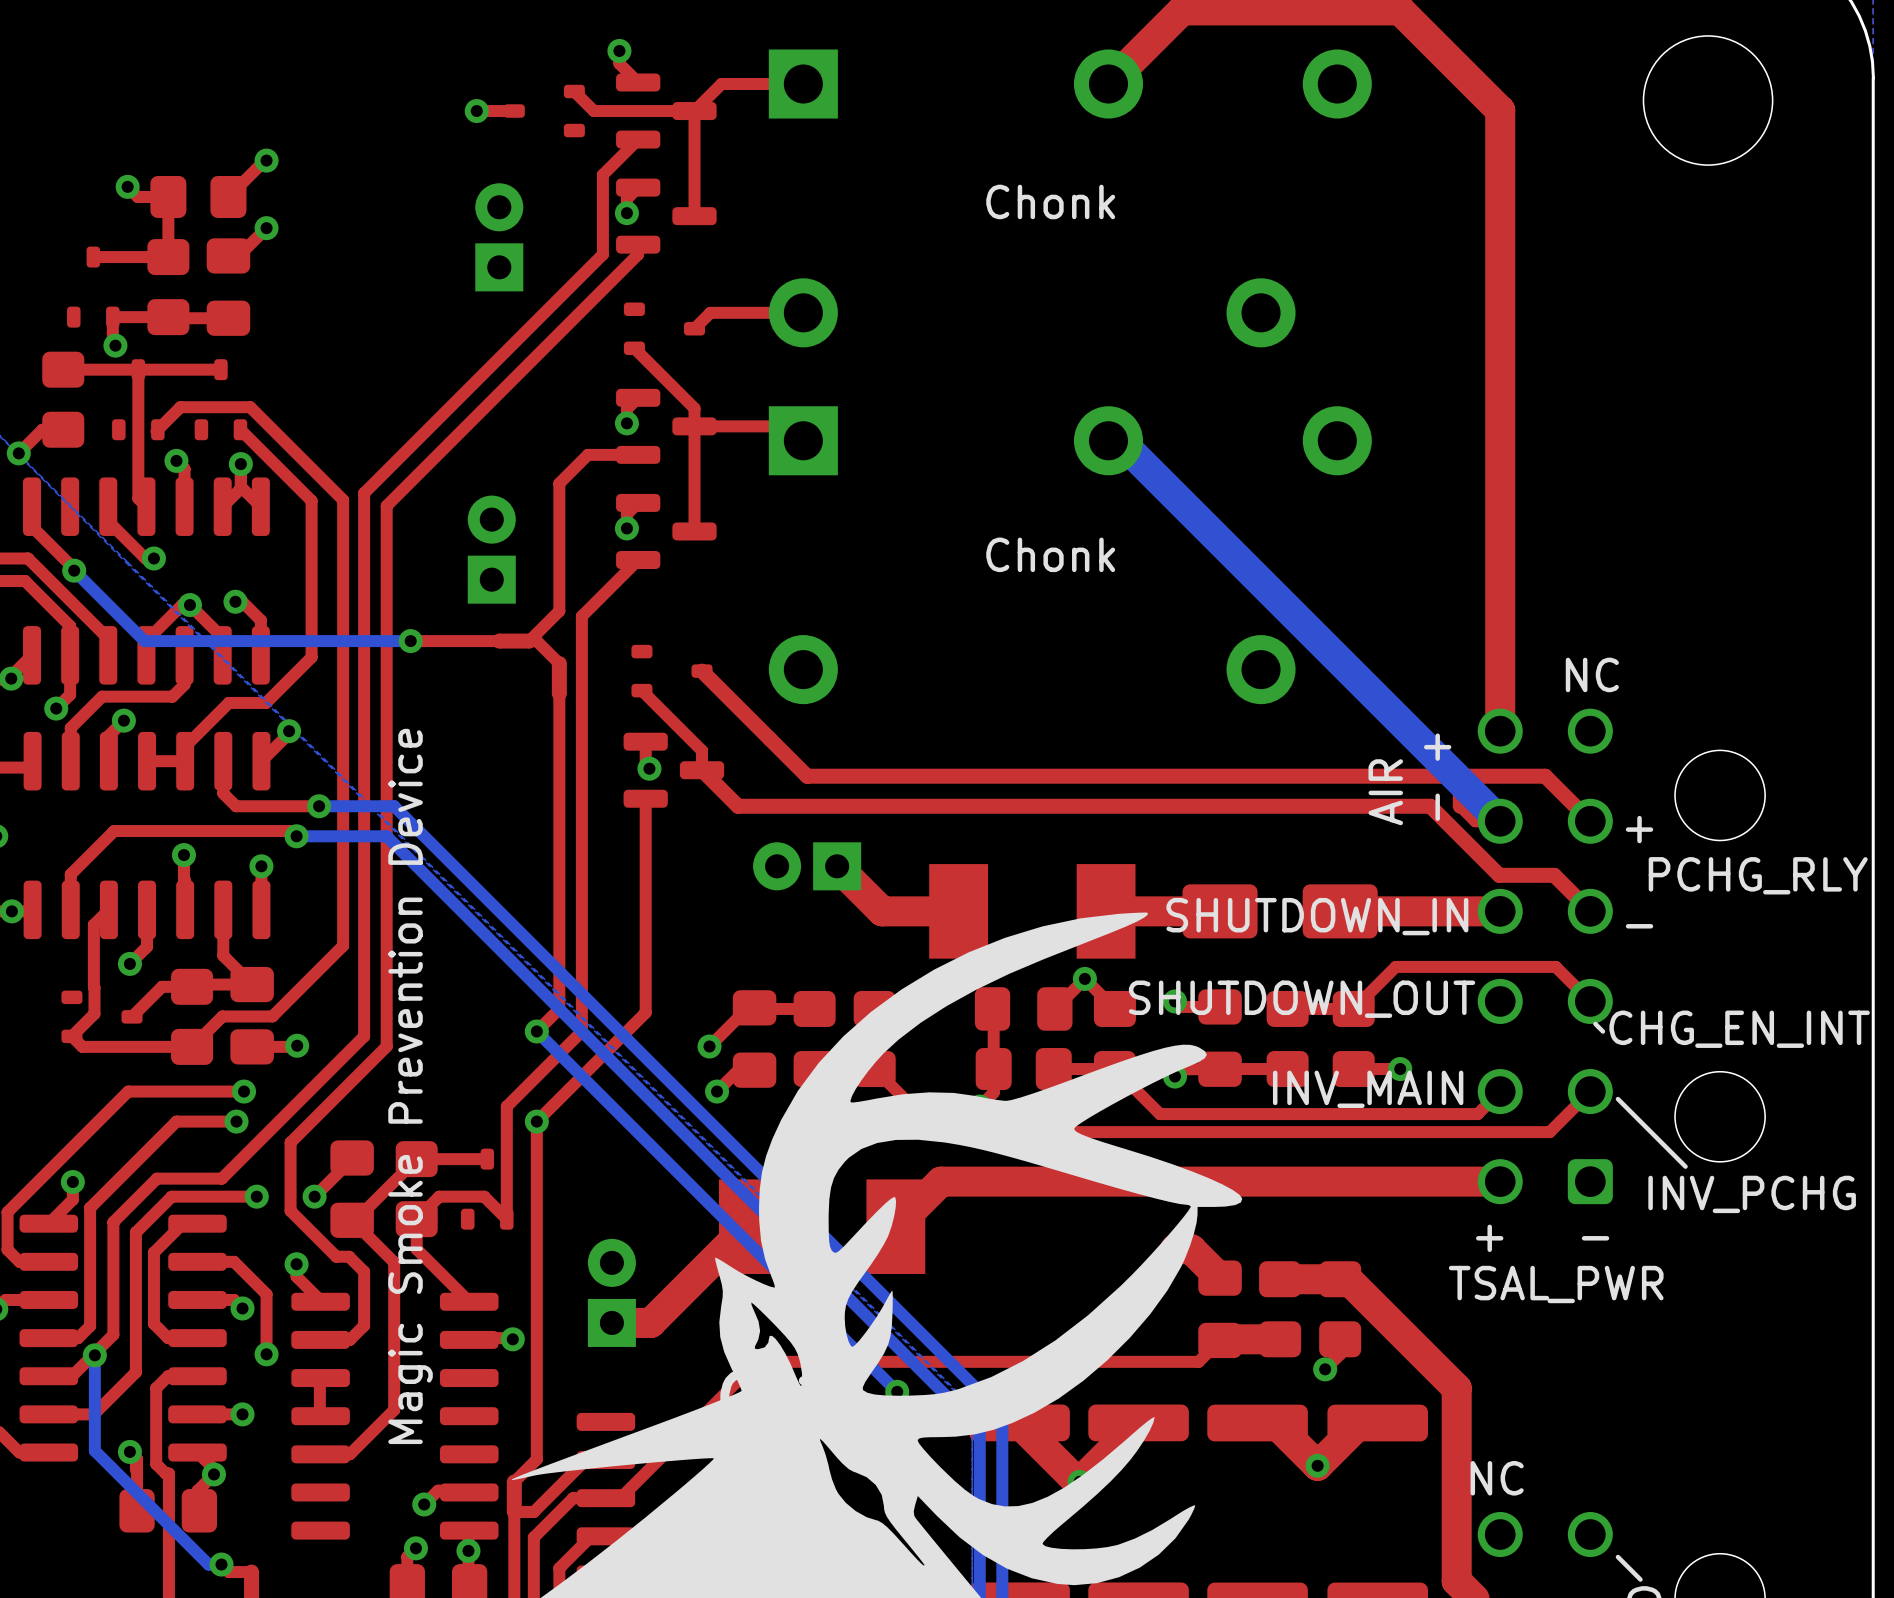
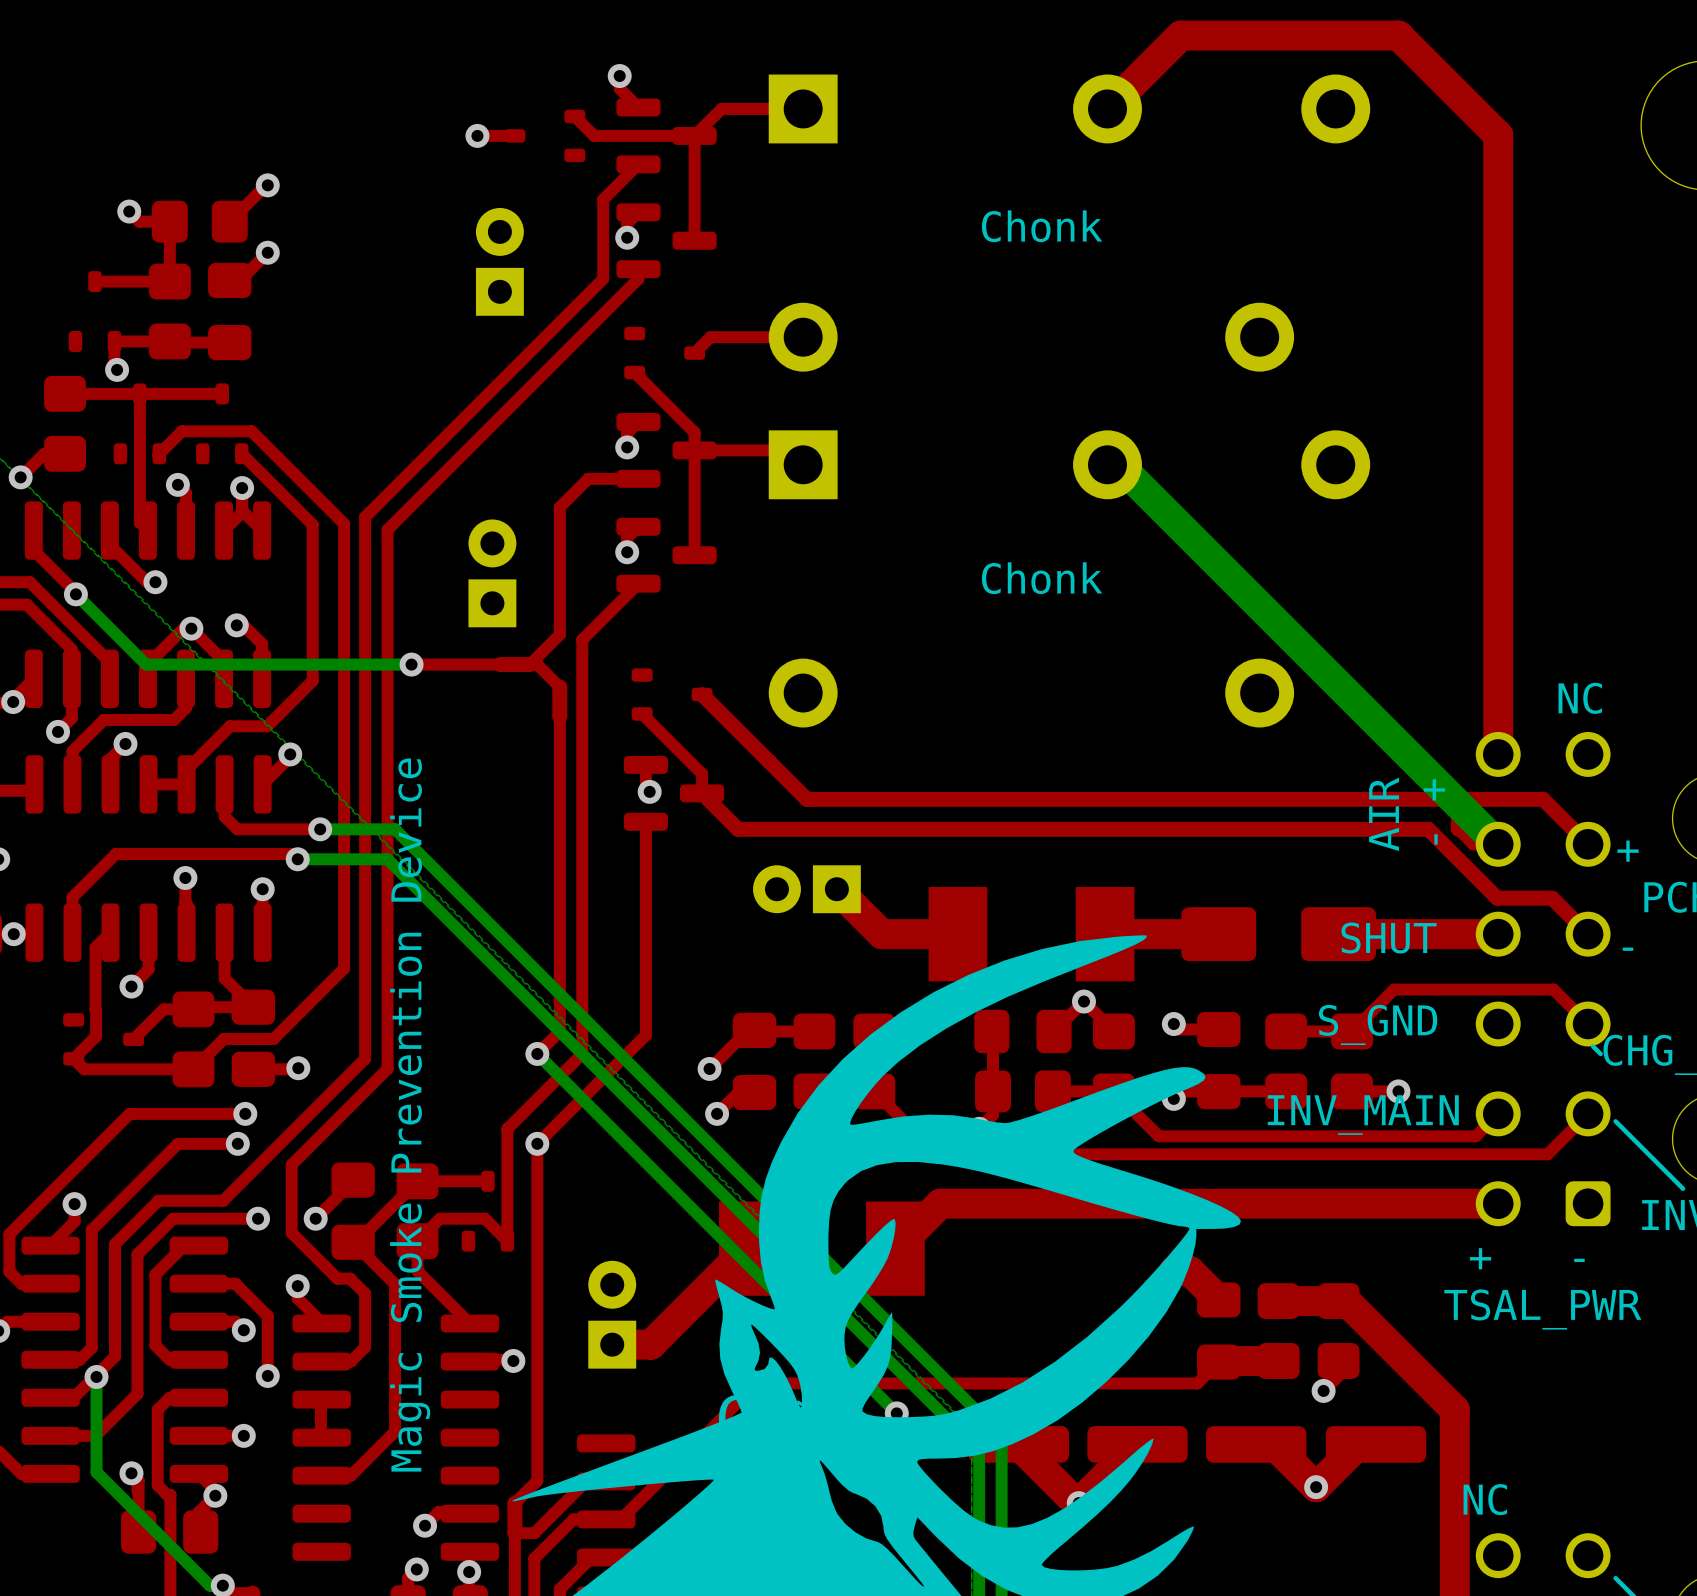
text: none -> SHUT (1388, 938)
text: SHUTDOWN_IN (1317, 916) -> none
text: SHUTDOWN_OUT (1302, 999) -> none
text: none -> S_GND (1378, 1024)

